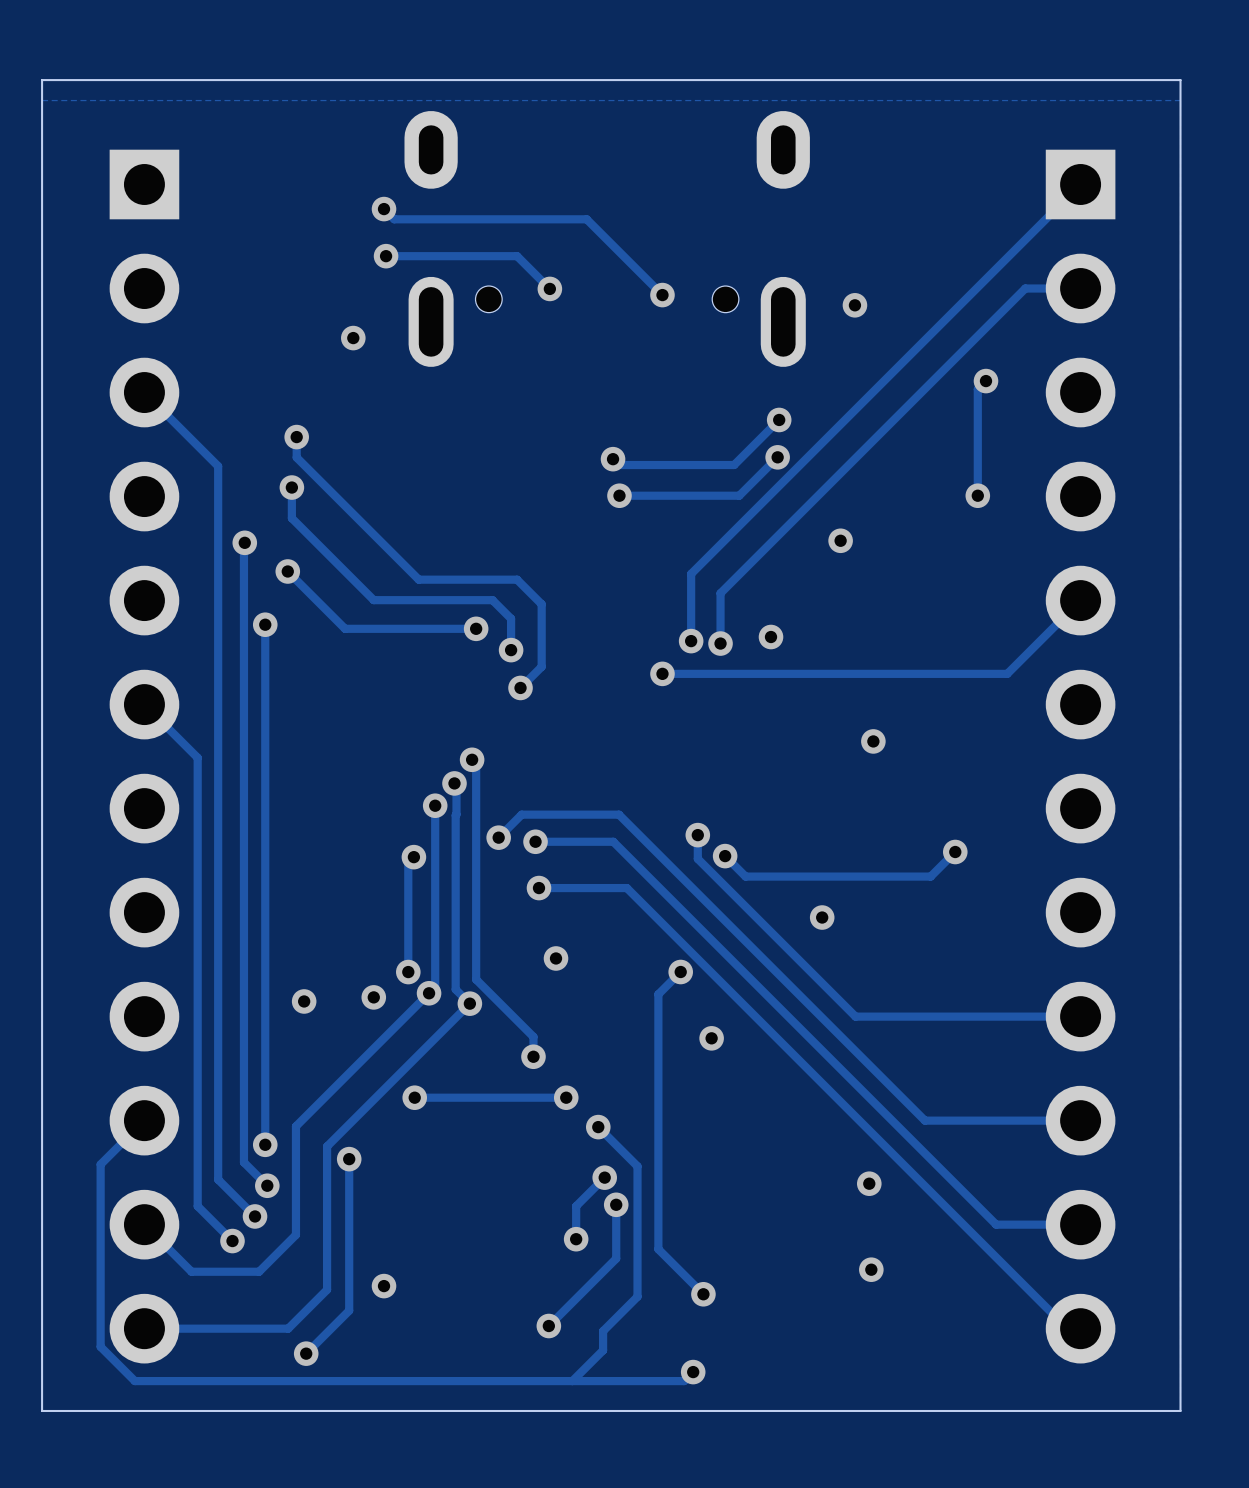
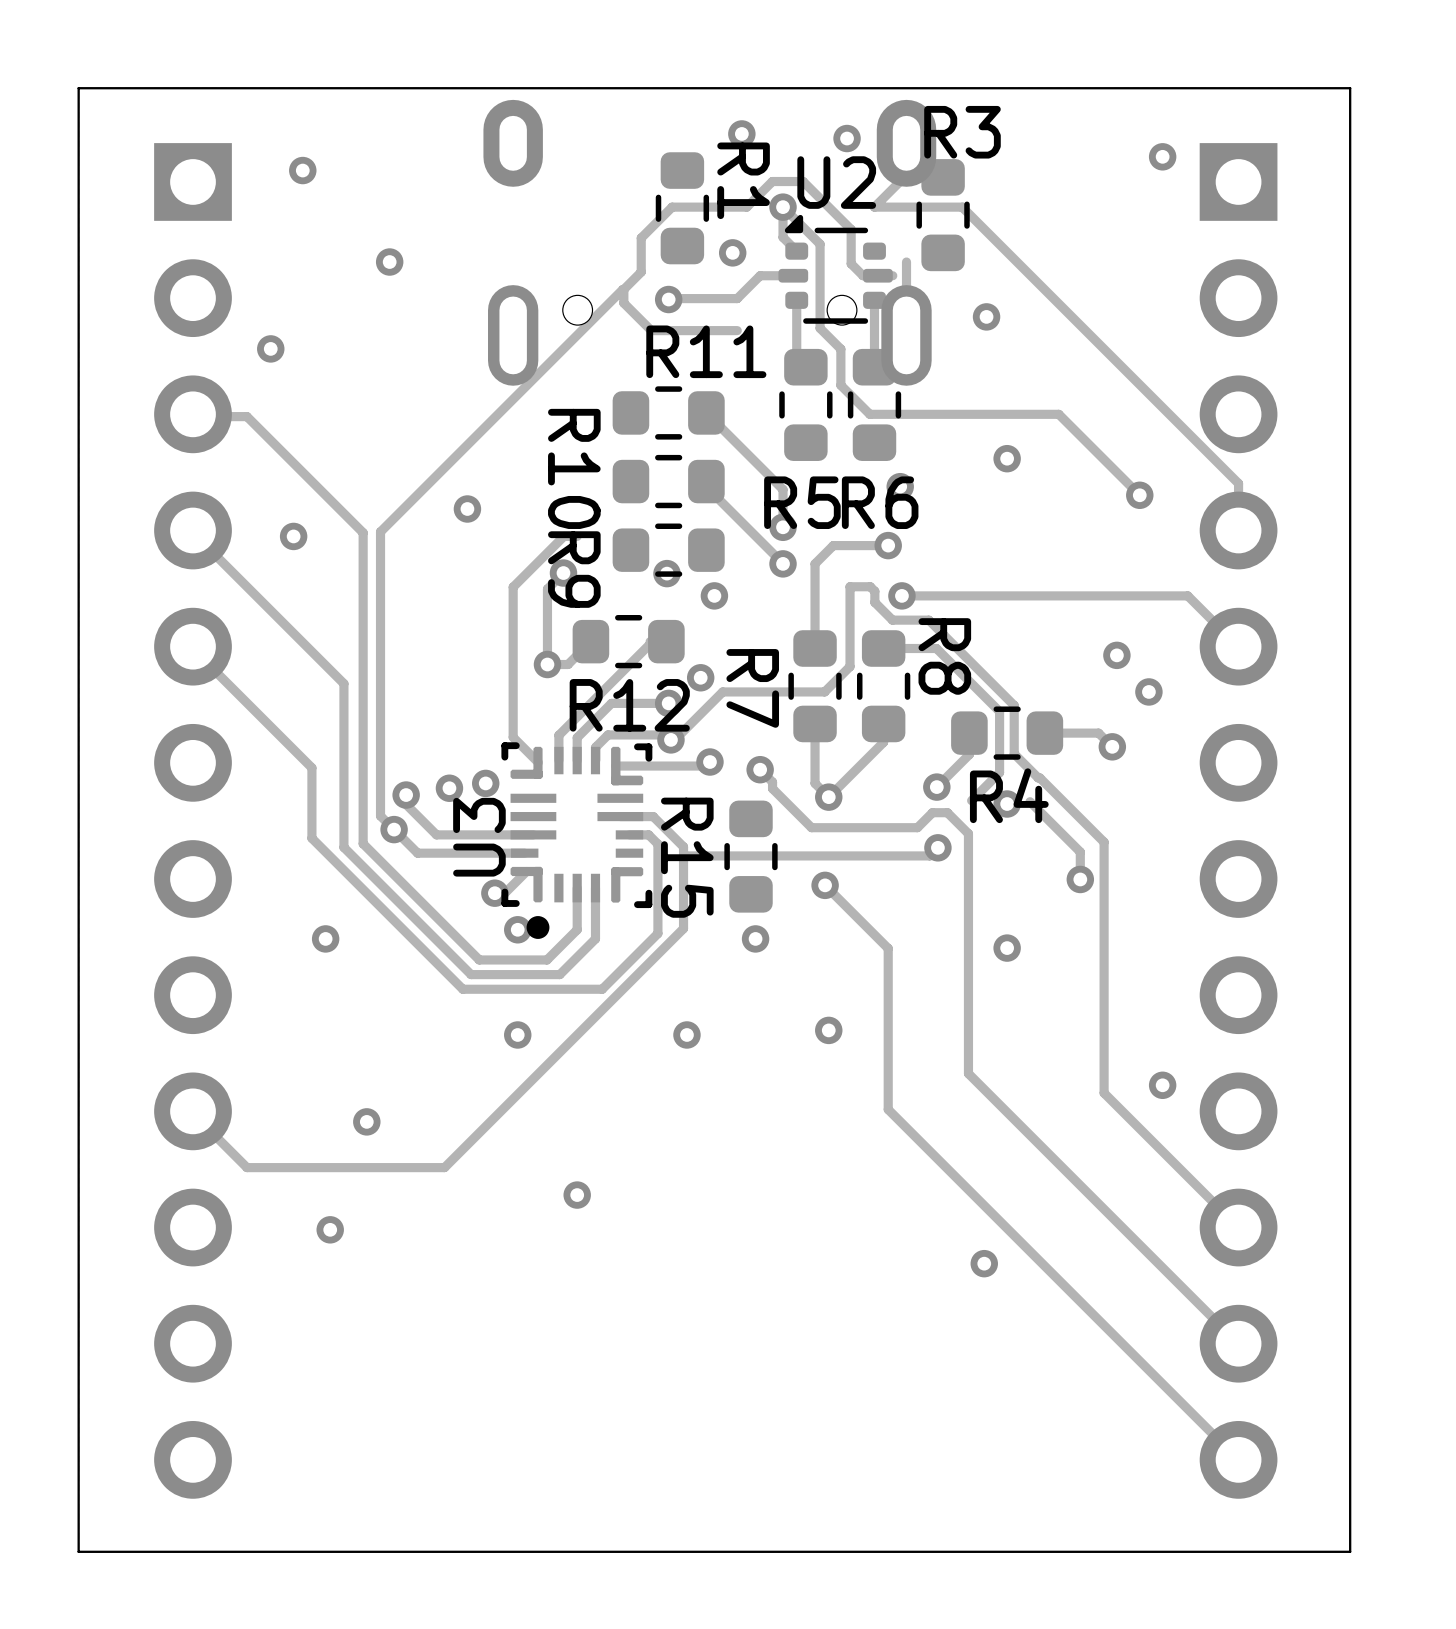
board edge: (1180, 100) (1180, 80) (42, 80) (42, 100) -> (1350, 88) (78, 88)
via: none -> (741, 133)
via: none -> (847, 138)
via: none -> (1162, 156)
via: none -> (302, 170)
track: none -> (943, 177) (904, 177) (874, 207) (962, 207)
track: (1080, 184) (691, 573) (691, 641) -> none
via: none -> (783, 207)
track: none -> (962, 207) (1238, 483) (1238, 530)
R1: none -> (682, 208)
track: (384, 209) (394, 219) (586, 219) (662, 295) -> none
via: (384, 209) -> none
R3: none -> (943, 215)
track: none -> (796, 251) (783, 237) (783, 207) (820, 244) (820, 328) (840, 349) (840, 385) (869, 414) (1058, 414) (1139, 495)
via: none -> (732, 252)
via: none -> (389, 262)
track: (386, 256) (517, 256) (549, 288) -> none
via: (386, 256) -> none
track: none -> (906, 262) (906, 289)
U2: none -> (835, 269)
track: none -> (793, 275) (760, 275) (737, 298) (668, 299)
track: none -> (892, 275) (863, 275) (851, 263) (851, 229) (803, 181) (772, 181) (746, 207) (672, 207) (641, 238) (641, 272) (623, 289) (623, 303) (651, 330) (737, 330)
track: none -> (622, 289) (380, 531) (380, 816) (417, 853) (524, 853)
via position: (549, 288) -> (668, 299)
track: (1080, 288) (1025, 288) (720, 593) (720, 643) -> none
track: none -> (796, 300) (796, 358) (805, 367)
track: none -> (874, 300) (874, 367)
via: (662, 295) -> none
via: none -> (270, 348)
via: (353, 338) -> none
track: (985, 381) (977, 389) (977, 495) -> none
via: (985, 381) -> none
R5: none -> (805, 404)
R6: none -> (874, 404)
R11: none -> (668, 412)
track: none -> (706, 412) (783, 489) (783, 527)
track: (144, 392) (218, 466) (218, 1179) (255, 1216) -> none
track: none -> (193, 416) (246, 416) (363, 532) (363, 843) (479, 959) (547, 959) (577, 929) (577, 888)
track: (779, 419) (734, 465) (618, 465) (613, 459) -> none
via: (779, 419) -> none
via: none -> (1007, 458)
track: (296, 437) (296, 457) (418, 579) (517, 579) (541, 604) (541, 666) (520, 687) -> none
via: (296, 437) -> none
R10: none -> (668, 481)
track: none -> (706, 481) (706, 486) (783, 563)
track: (777, 457) (739, 495) (619, 495) -> none
via: (613, 459) -> none
via: none -> (467, 509)
track: (291, 487) (291, 518) (373, 600) (492, 600) (511, 618) (511, 650) -> none
via: (291, 487) -> none
via: none -> (783, 527)
via: (619, 495) -> none
via position: (977, 495) -> (1139, 495)
track: none -> (193, 532) (343, 683) (343, 847) (471, 974) (559, 974) (595, 938) (595, 888)
via: none -> (293, 536)
track: none -> (577, 536) (563, 536) (513, 587) (513, 737) (538, 762)
track: none -> (888, 545) (833, 545) (815, 563) (815, 648)
via: none -> (888, 545)
R9: none -> (668, 550)
via: none -> (783, 563)
track: none -> (563, 573) (547, 589) (547, 664) (568, 664) (590, 641)
via: none -> (563, 573)
via: none -> (666, 573)
via: (840, 540) -> none
via: (244, 542) -> none
track: (244, 544) (246, 542) (243, 545) (243, 1162) (267, 1185) -> none
via: none -> (714, 595)
via: none -> (901, 595)
track: (287, 571) (345, 628) (476, 628) -> none
via: (287, 571) -> none
R12: none -> (628, 641)
track: none -> (652, 641) (558, 735) (558, 760)
track: (1080, 600) (1007, 673) (662, 673) -> (1238, 646) (1187, 595) (901, 595)
track: none -> (193, 648) (311, 767) (311, 838) (462, 989) (602, 989) (657, 933) (657, 844) (648, 834) (629, 834)
track: none -> (883, 648) (936, 648) (999, 711) (999, 772) (971, 800)
via: none -> (1116, 655)
track: (265, 624) (265, 1144) -> none
via: (265, 624) -> none
via position: (476, 628) -> (547, 664)
via: none -> (700, 677)
R7: none -> (815, 686)
R8: none -> (883, 686)
via: (771, 637) -> none
via: (691, 641) -> none
via: none -> (1148, 691)
via: (720, 643) -> none
via: (511, 650) -> none
track: none -> (668, 703) (611, 703) (577, 737) (577, 760)
via: none -> (668, 703)
track: none -> (883, 723) (883, 742) (828, 797) (815, 783) (815, 723)
via: (662, 673) -> none
track: none -> (969, 733) (969, 754) (936, 787)
R4: none -> (1007, 733)
track: none -> (1044, 733) (1098, 733) (1112, 746)
via: none -> (670, 739)
via: (520, 687) -> none
via: none -> (1112, 746)
track: none -> (709, 762) (705, 766) (615, 766)
via: none -> (709, 762)
track: (144, 704) (197, 757) (197, 1206) (227, 1236) -> none
via: none -> (760, 769)
via: none -> (485, 783)
via: none -> (936, 787)
via: none -> (449, 788)
track: none -> (406, 795) (406, 804) (436, 834) (533, 834)
via: none -> (406, 795)
via: none -> (828, 797)
track: none -> (1030, 801) (1080, 852) (1080, 879)
track: none -> (620, 816) (653, 816) (683, 846) (683, 928) (444, 1167) (246, 1167) (193, 1113)
track: (472, 759) (476, 763) (476, 979) (533, 1036) (533, 1056) -> none
via: (472, 759) -> none
via: none -> (394, 829)
U3: none -> (576, 840)
track: none -> (937, 847) (929, 855) (683, 855)
via: none -> (937, 847)
track: (454, 783) (456, 785) (455, 989) (469, 1003) (327, 1146) (327, 1289) (288, 1328) (144, 1328) -> none
via: (454, 783) -> none
R15: none -> (751, 856)
track: none -> (526, 871) (504, 893) (494, 893)
track: (435, 805) (435, 987) (429, 993) -> none
via position: (435, 805) -> (494, 893)
via: none -> (1080, 879)
track: (697, 835) (697, 858) (855, 1016) (1080, 1016) -> none
via position: (697, 835) -> (825, 885)
track: (498, 837) (521, 814) (618, 814) (924, 1120) (1080, 1120) -> (595, 760) (595, 747) (608, 734) (666, 734) (670, 739) (674, 739) (722, 691) (824, 691) (850, 666) (850, 586) (870, 586) (874, 591) (874, 602) (892, 620) (928, 620) (1014, 705) (1014, 753) (1104, 842) (1104, 1093) (1238, 1227)
via: (498, 837) -> none
track: (535, 841) (613, 841) (996, 1224) (1080, 1224) -> (760, 769) (772, 782) (772, 788) (811, 827) (917, 827) (932, 812) (947, 812) (968, 833) (968, 1073) (1238, 1343)
via: (535, 841) -> none
track: (955, 852) (930, 876) (745, 876) (725, 856) -> none
via: (955, 852) -> none
via: (725, 856) -> none
track: (413, 857) (408, 862) (408, 972) -> none
via position: (413, 857) -> (517, 929)
via: none -> (325, 938)
via: none -> (755, 938)
via: none -> (1007, 948)
track: (539, 888) (626, 888) (1067, 1328) (1080, 1328) -> (825, 885) (888, 948) (888, 1109) (1238, 1459)
via: (539, 888) -> none
via: (822, 917) -> none
via: none -> (517, 1034)
via position: (556, 958) -> (686, 1034)
via: (408, 972) -> none
track: (680, 972) (658, 994) (658, 1249) (703, 1294) -> none
via position: (680, 972) -> (828, 1030)
track: (429, 993) (295, 1126) (295, 1234) (259, 1271) (191, 1271) (144, 1224) -> none
via: (429, 993) -> none
via: none -> (1162, 1085)
via: (373, 997) -> none
via position: (304, 1001) -> (366, 1121)
via: (469, 1003) -> none
via: (711, 1038) -> none
via: (533, 1056) -> none
via: none -> (577, 1195)
via: (414, 1097) -> none
track: (566, 1097) (414, 1097) -> none
via: (566, 1097) -> none
track: (144, 1120) (100, 1164) (100, 1346) (134, 1381) (684, 1381) (693, 1372) -> none
track: (598, 1127) (637, 1166) (637, 1296) (603, 1331) (603, 1350) (572, 1381) -> none
via: (598, 1127) -> none
via position: (265, 1144) -> (330, 1229)
track: (349, 1159) (349, 1310) (306, 1353) -> none
via: (349, 1159) -> none
track: (604, 1177) (576, 1206) (576, 1239) -> none
via: (604, 1177) -> none
via position: (869, 1183) -> (984, 1263)
via: (267, 1185) -> none
track: (616, 1204) (616, 1258) (548, 1326) -> none
via: (616, 1204) -> none
via: (255, 1216) -> none
via: (576, 1239) -> none
via: (232, 1241) -> none
via: (871, 1269) -> none
via: (384, 1286) -> none
via: (703, 1294) -> none
via: (548, 1326) -> none
via: (306, 1353) -> none
via: (693, 1372) -> none

